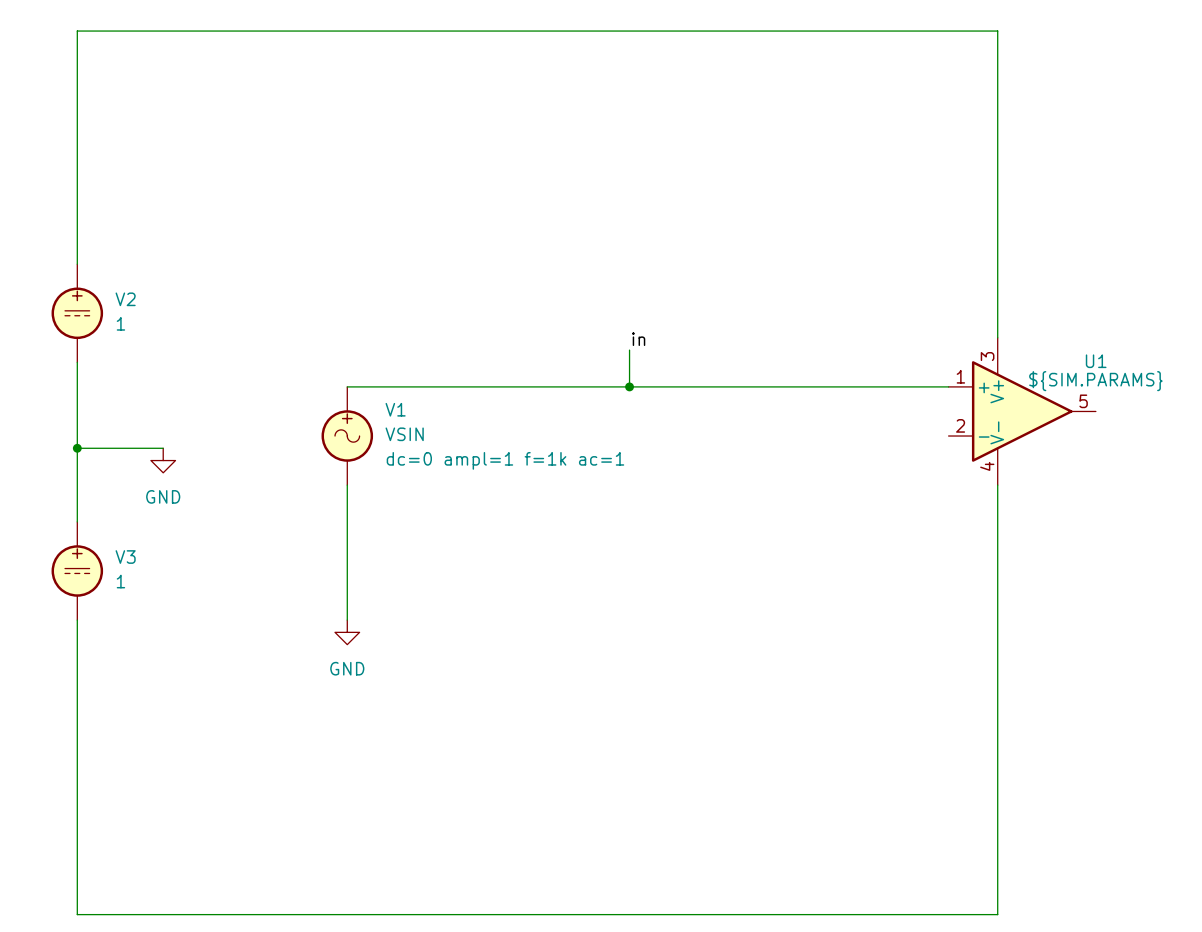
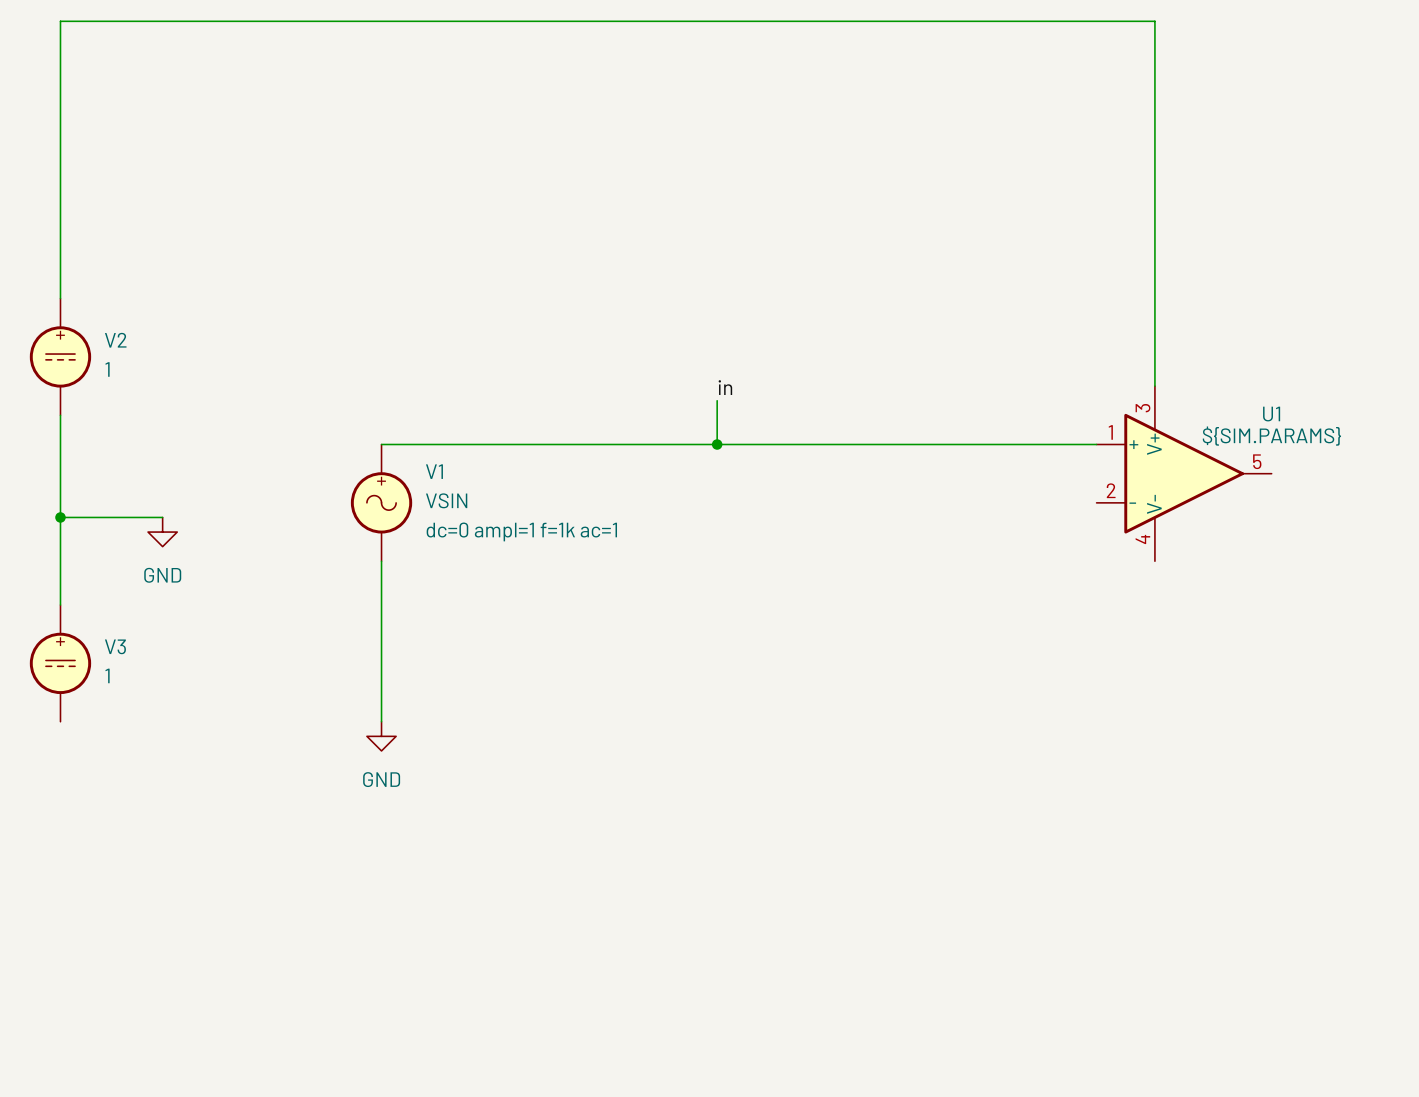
wire: (997, 485) (997, 914) (77, 914) (77, 620) -> none

